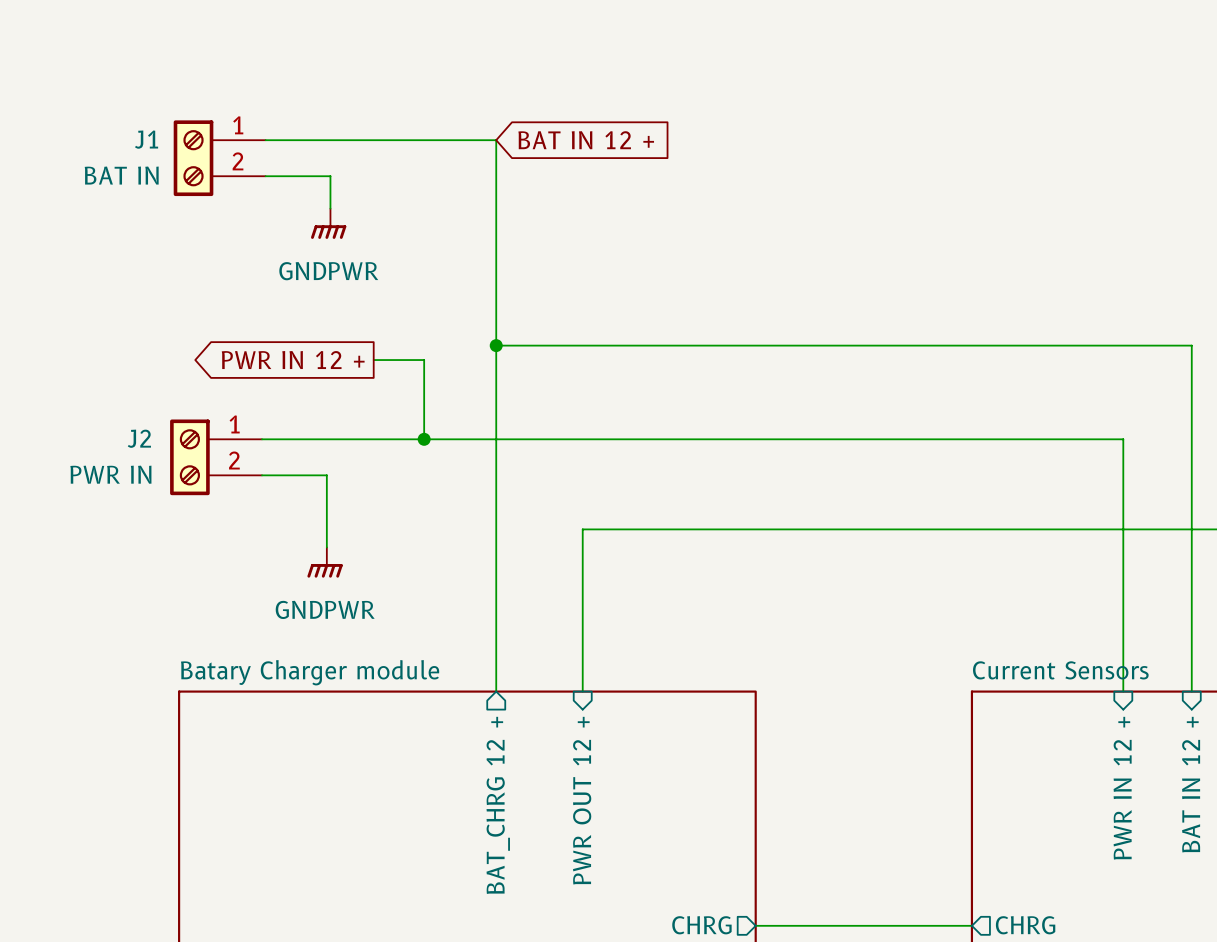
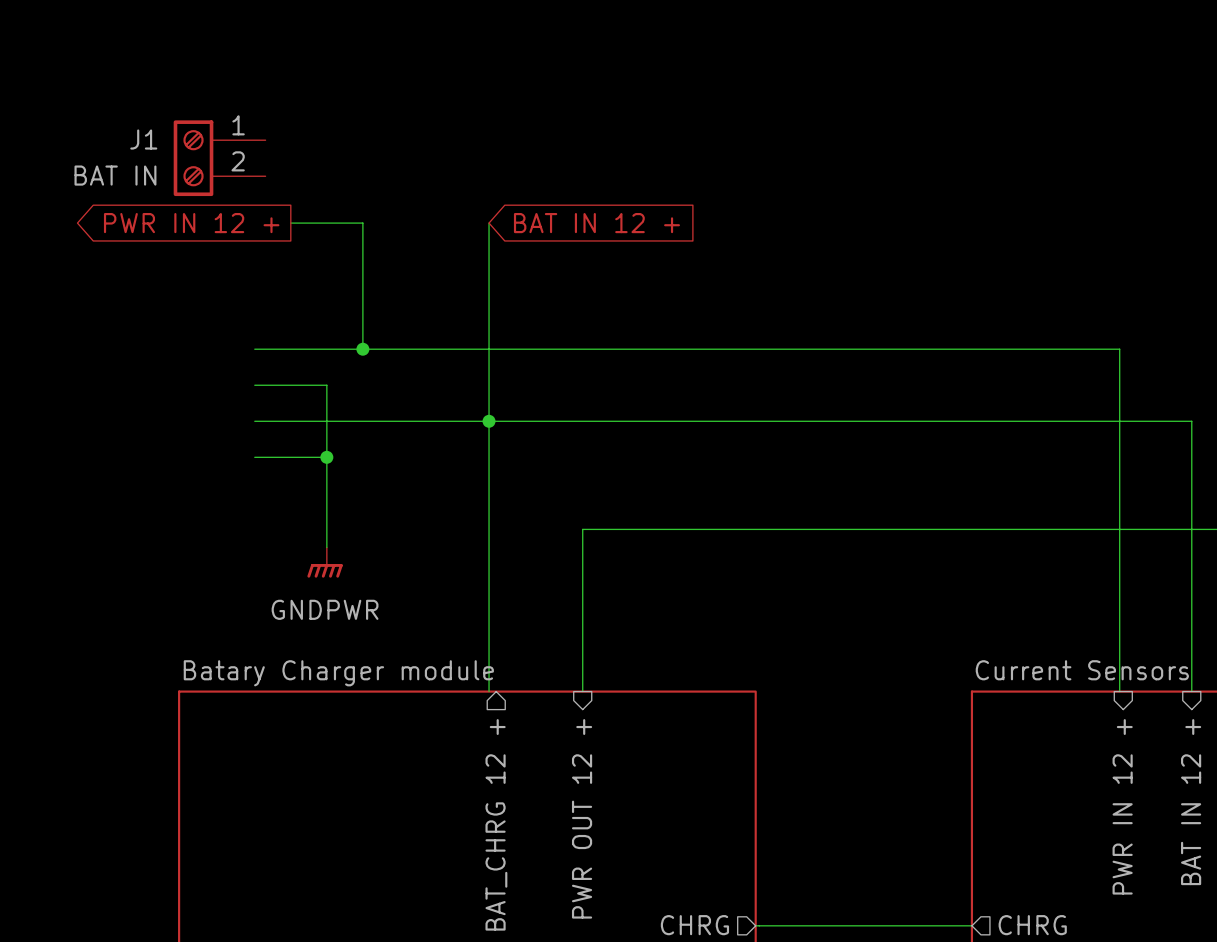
wire: (265, 140) (496, 140) (496, 691) -> none
global label position: BAT IN 12 + (586, 140) -> BAT IN 12 + (596, 223)
wire: (265, 176) (330, 176) (330, 208) -> none
wire: none -> (290, 223) (362, 223) (362, 349)
power symbol: GNDPWR (328, 223) -> none
wire: none -> (489, 223) (489, 691)
wire: (496, 345) (1191, 345) (1191, 421) -> (254, 421) (1191, 421)
junction: (496, 345) -> none
wire: none -> (254, 349) (1119, 349) (1119, 691)
junction: none -> (362, 349)
global label position: PWR IN 12 + (293, 360) -> PWR IN 12 + (191, 223)
wire: (373, 360) (424, 360) (424, 439) -> none
junction: none -> (489, 421)
wire: (261, 439) (1123, 439) (1123, 691) -> none
junction: (424, 439) -> none
J2: PWR IN (216, 457) -> none
wire: none -> (254, 457) (326, 457)
junction: none -> (326, 457)
wire: (261, 475) (326, 475) -> (254, 385) (326, 385) (326, 475)

